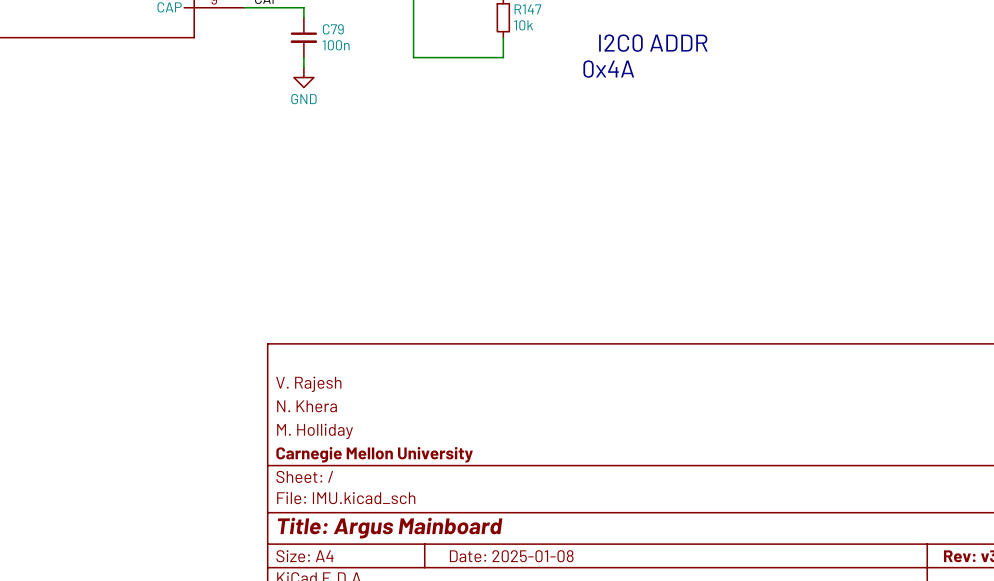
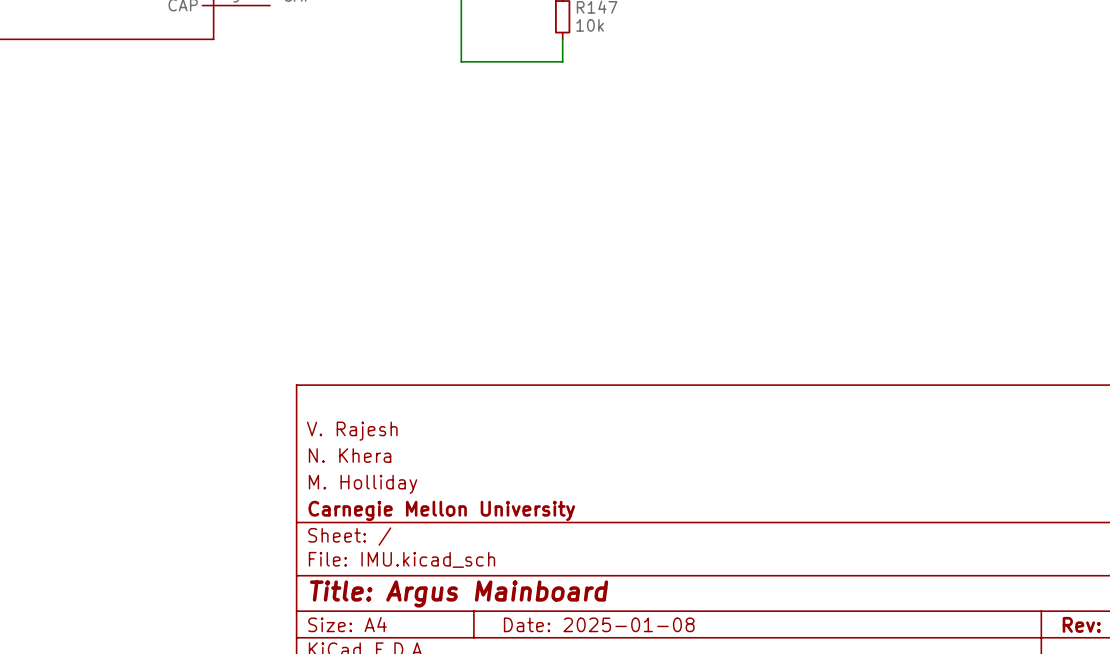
wire: (244, 7) (303, 7) (303, 17) -> none
C79: 100n (303, 37) -> none
text: I2C0 ADDR (653, 43) -> none
wire: (303, 57) (303, 67) -> none
text: 0x4A (608, 69) -> none
power symbol: GND (303, 77) -> none

